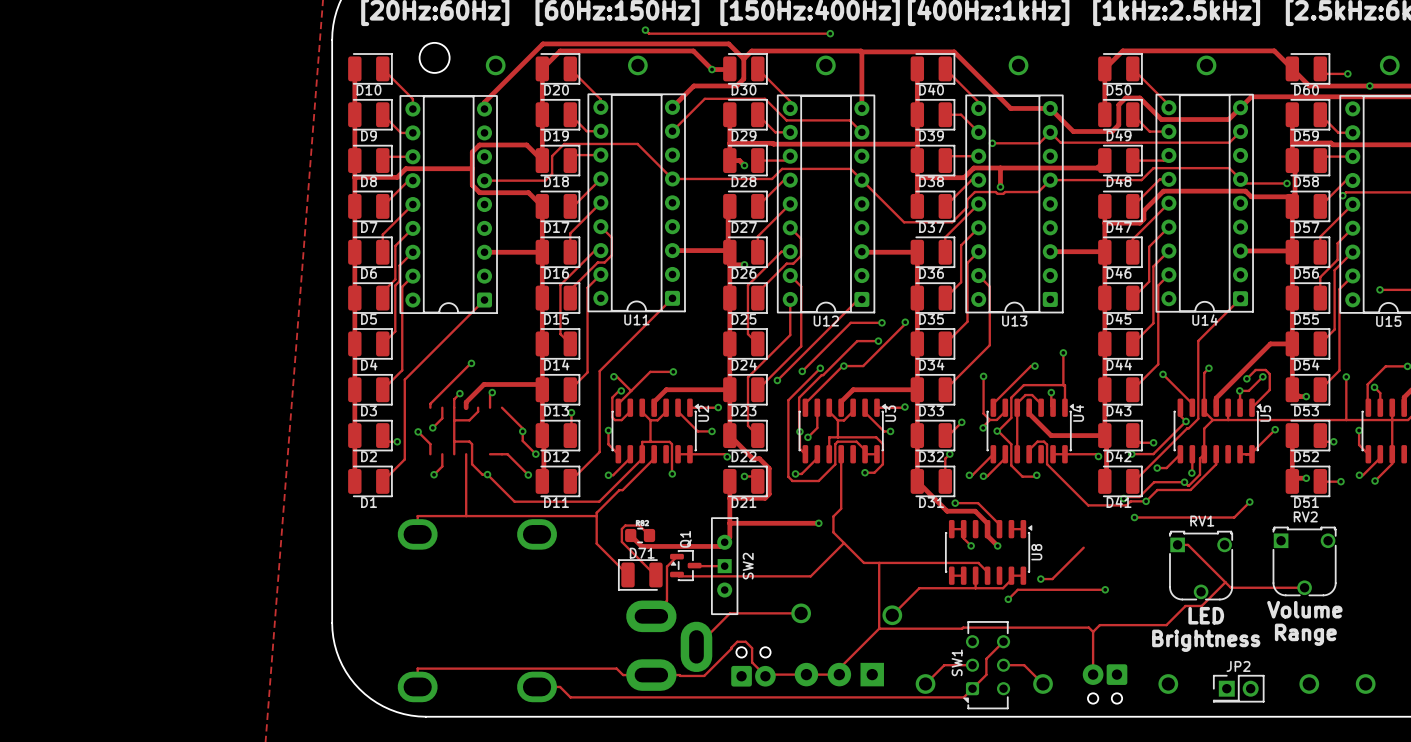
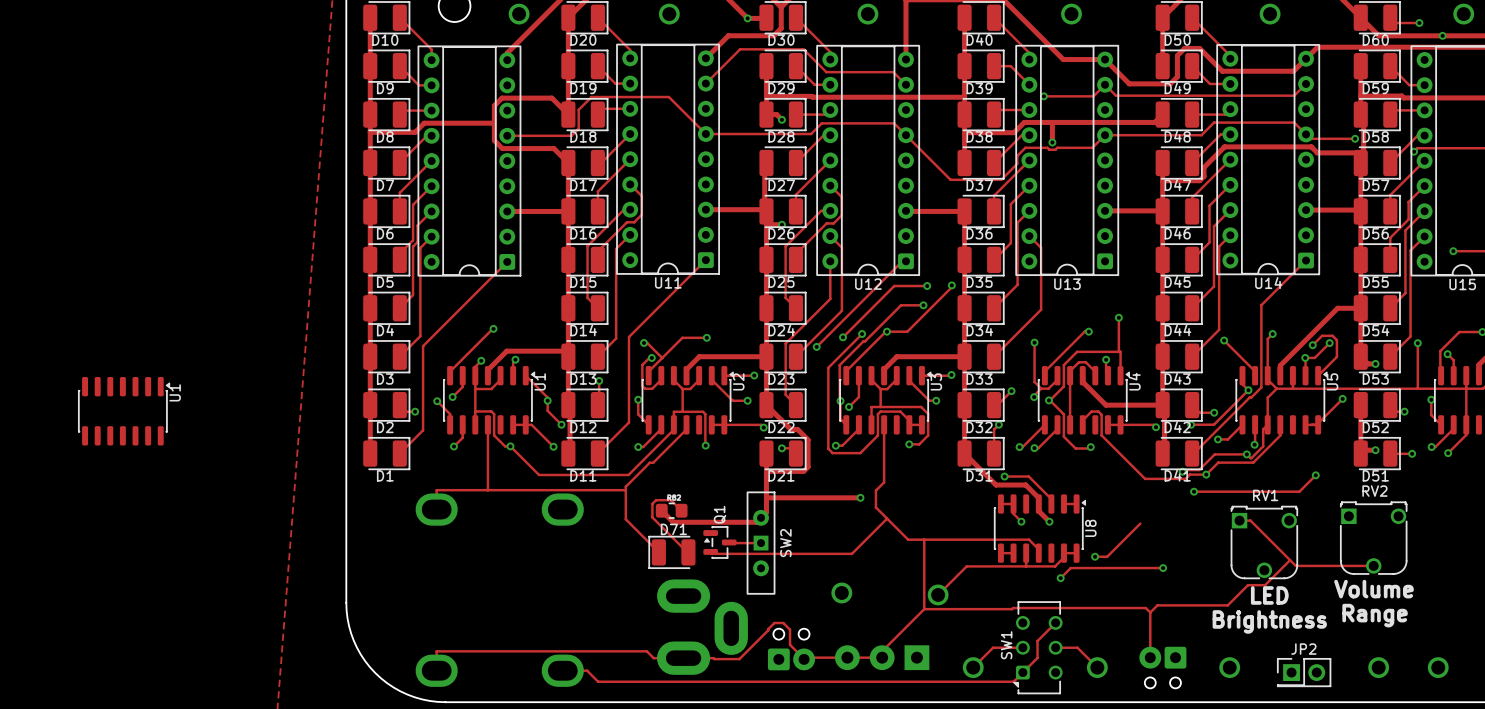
U1: none -> (489, 400)
U1: none -> (124, 411)
track: (676, 556) (666, 566) (666, 600) (651, 616) -> none
track: (801, 613) (729, 613) (696, 646) -> none

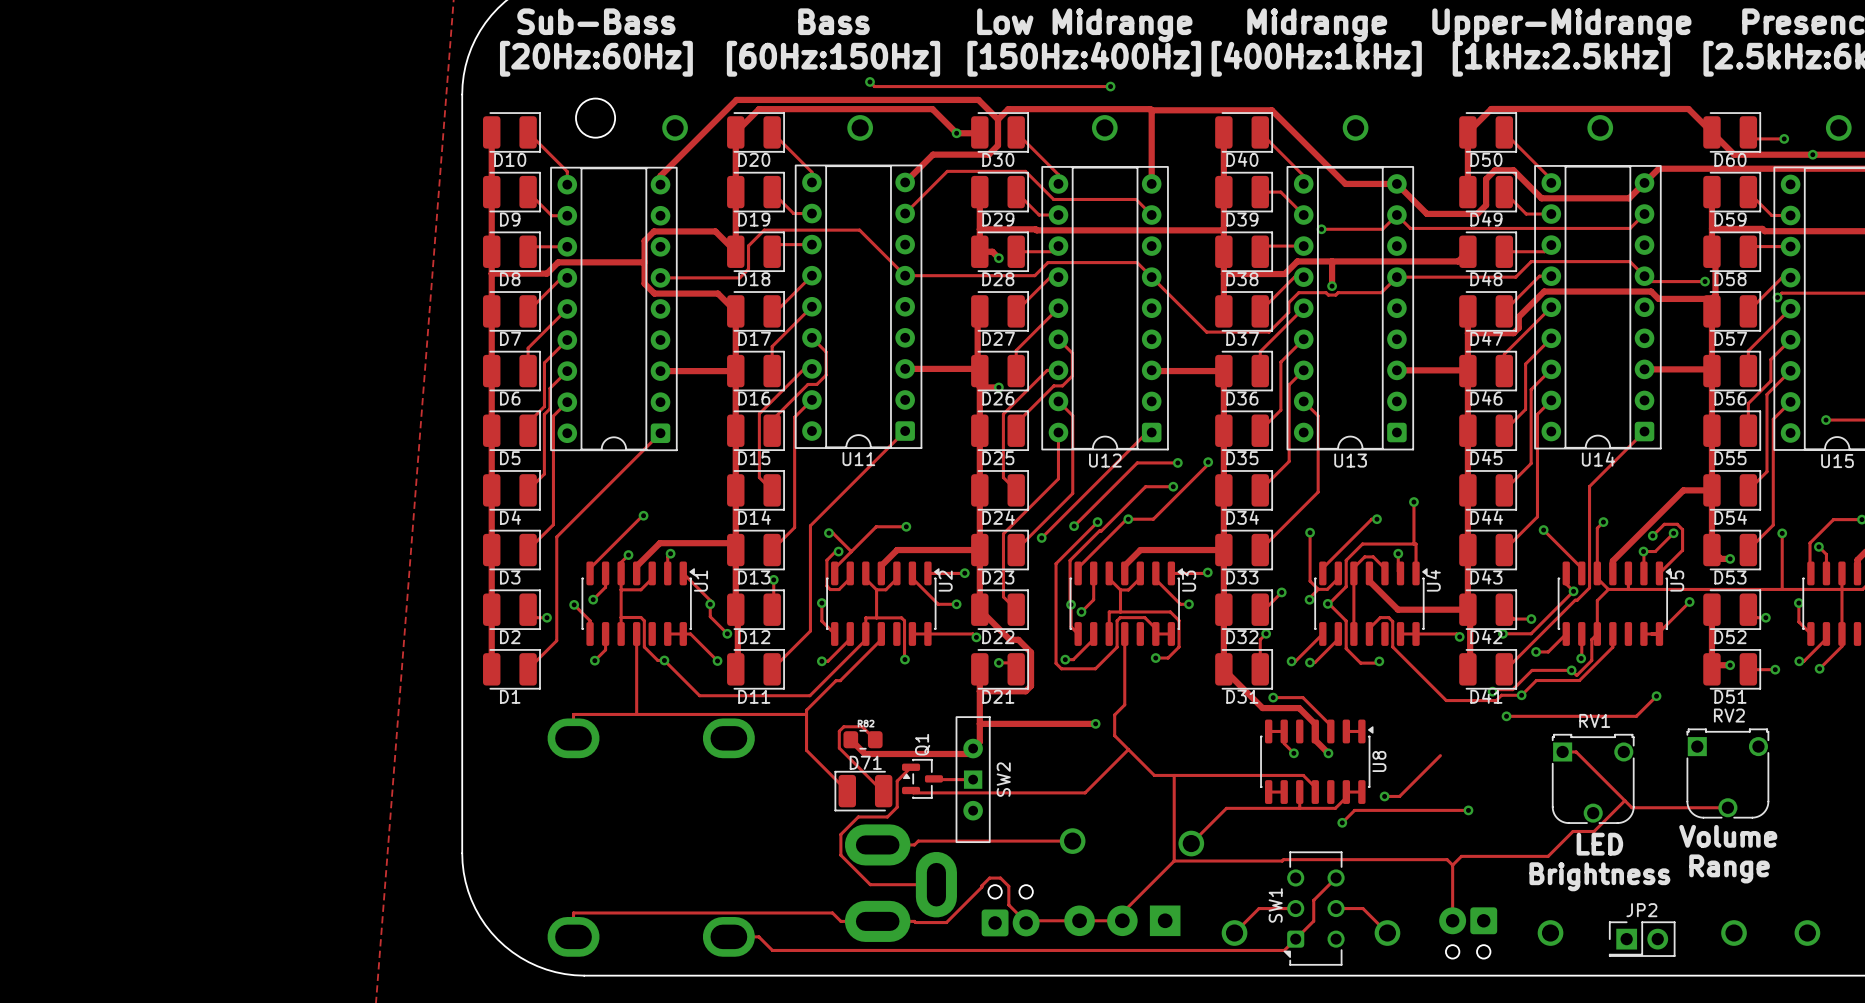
U1: (124, 411) -> none
track: none -> (911, 767) (897, 781) (897, 807) (887, 816) (858, 816) (840, 834) (840, 855) (870, 884) (936, 884)
track: none -> (1072, 841) (918, 841) (914, 844) (877, 844)

